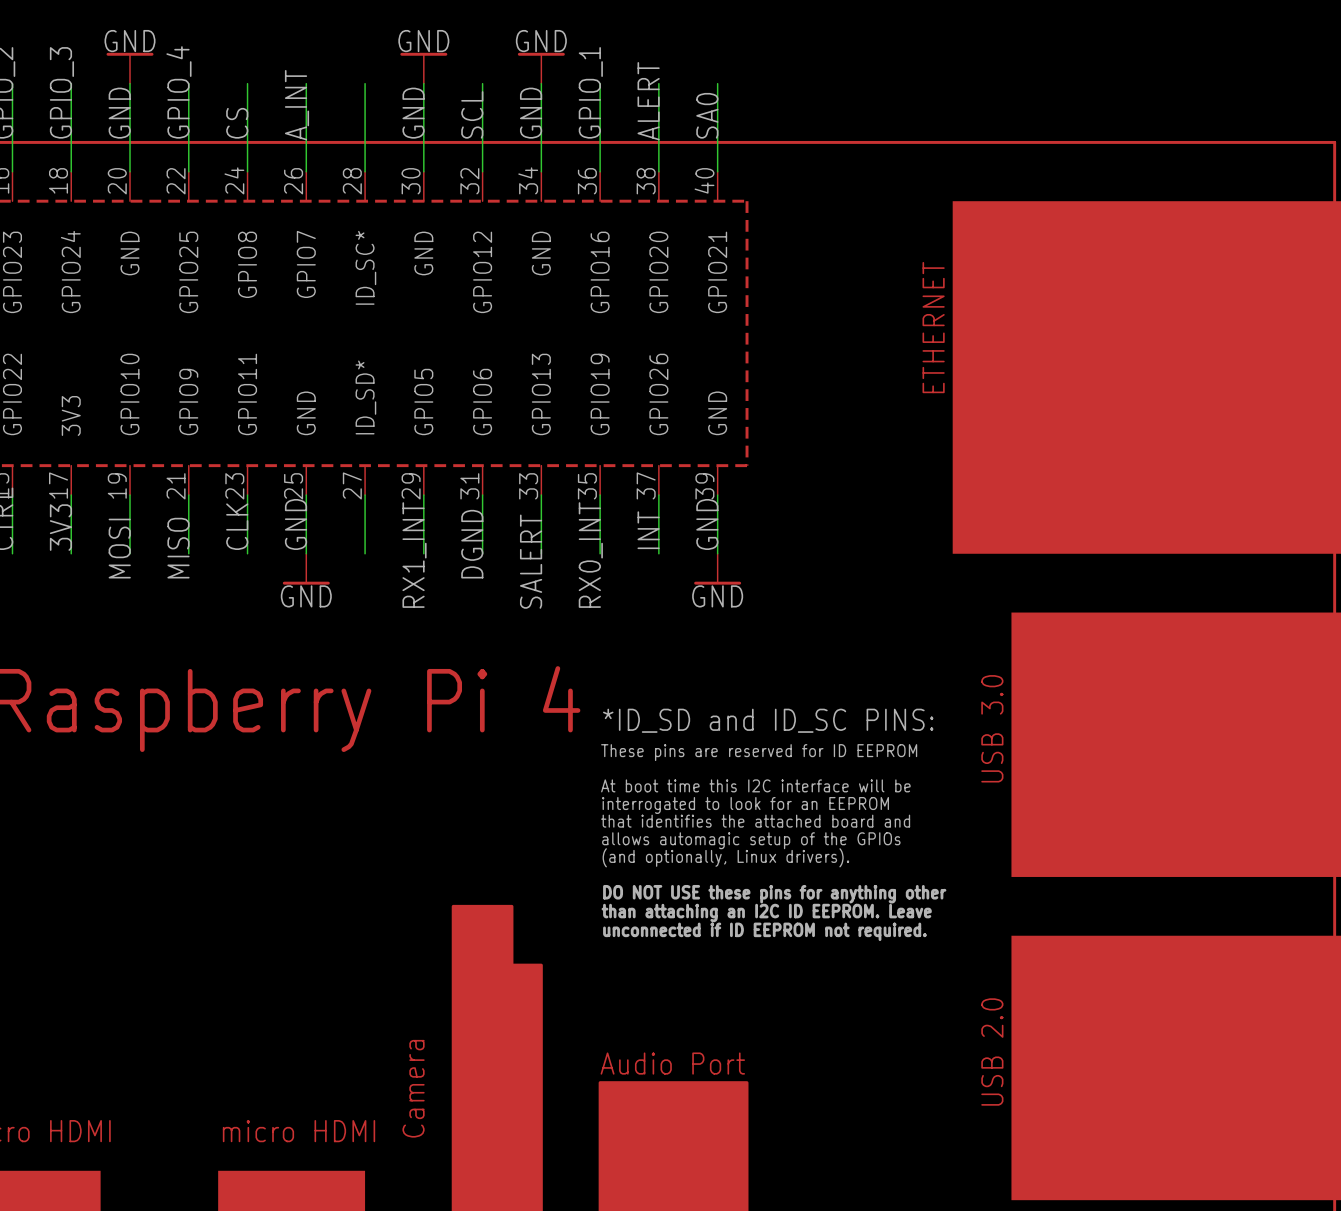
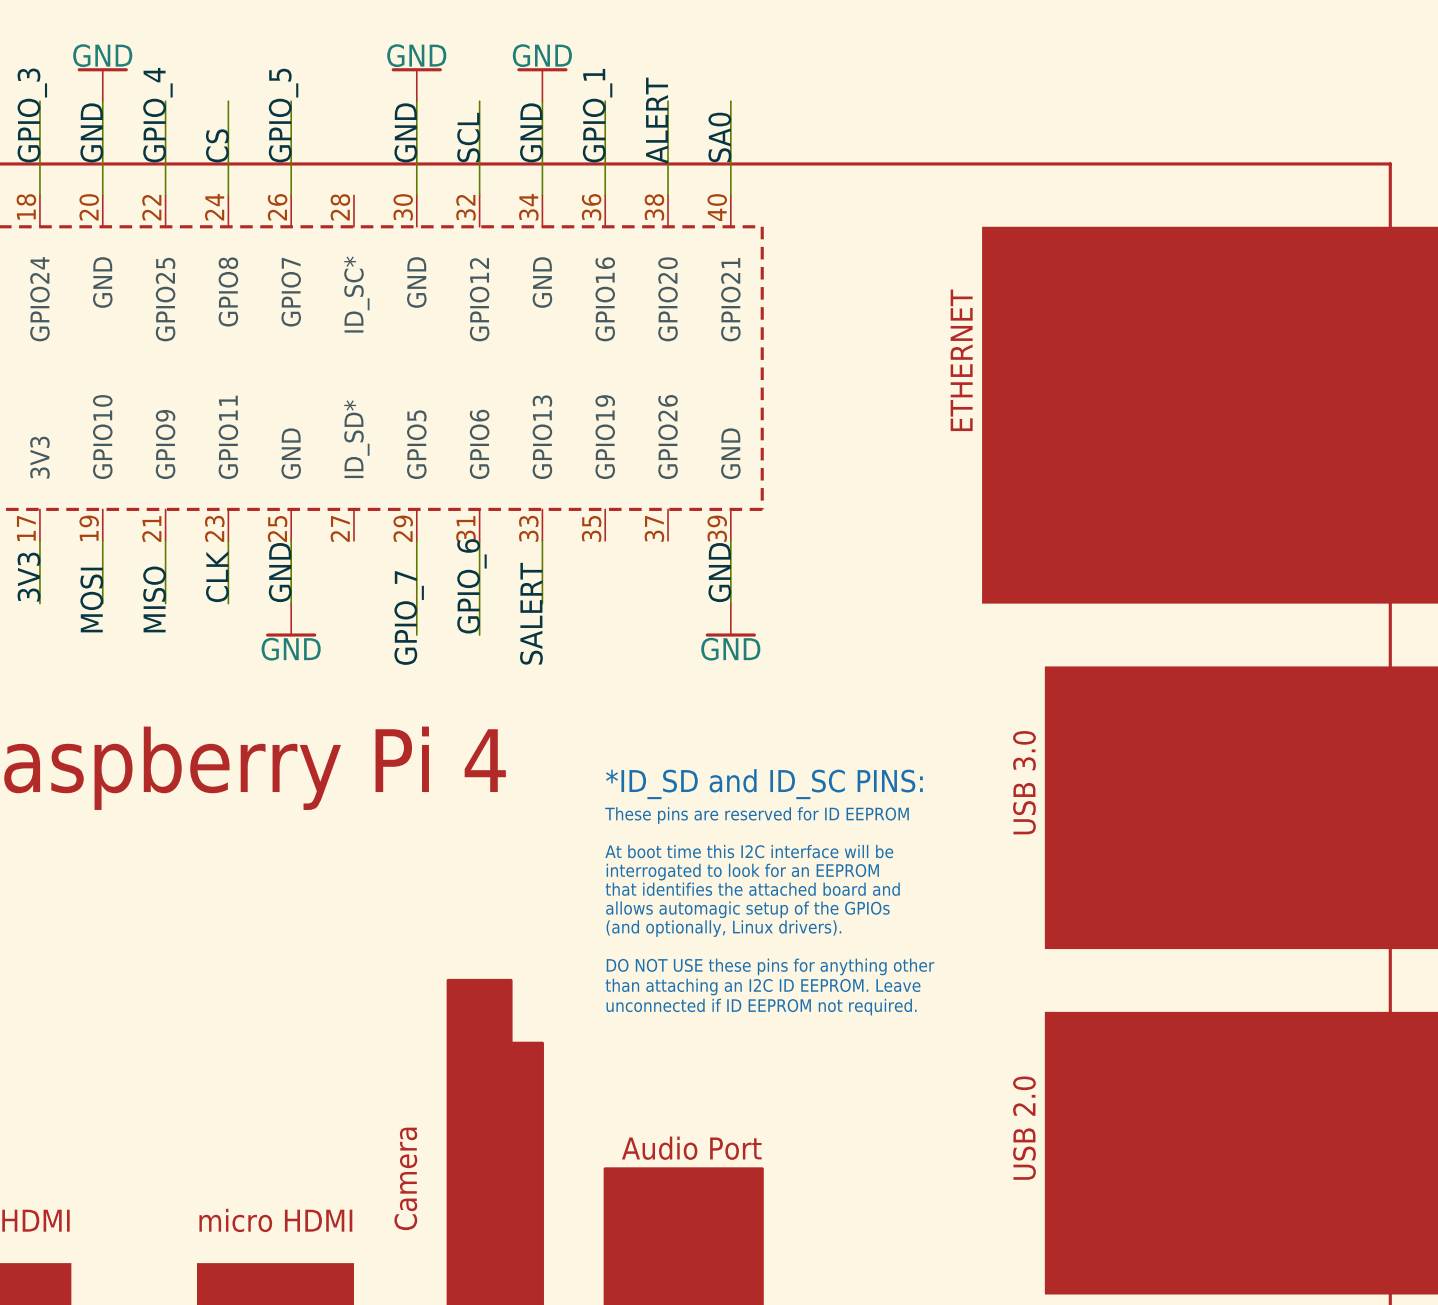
wire: (365, 83) (365, 171) -> none
label: A_INT (296, 105) -> GPIO_5 (283, 115)
wire: (365, 495) (365, 553) -> none
wire: (600, 495) (600, 553) -> none
wire: (658, 495) (658, 553) -> none
label: INT (648, 530) -> none
label: DGND (472, 544) -> GPIO_6 (471, 586)
wire: none -> (416, 603) (416, 635)
wire: none -> (479, 603) (479, 635)
label: RX1_INT (414, 555) -> GPIO_7 (409, 618)
label: RX0_INT (590, 555) -> none

